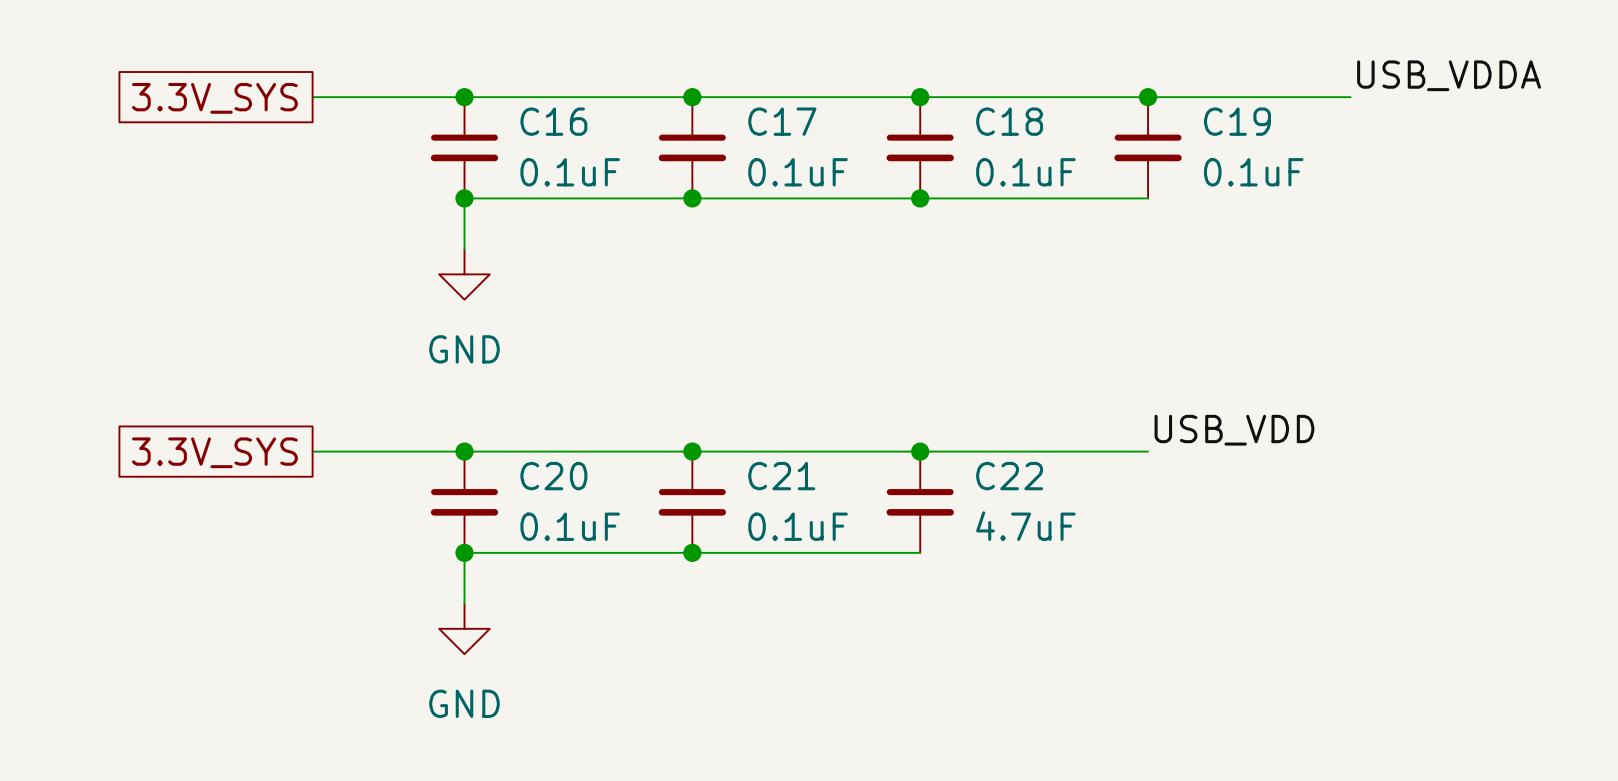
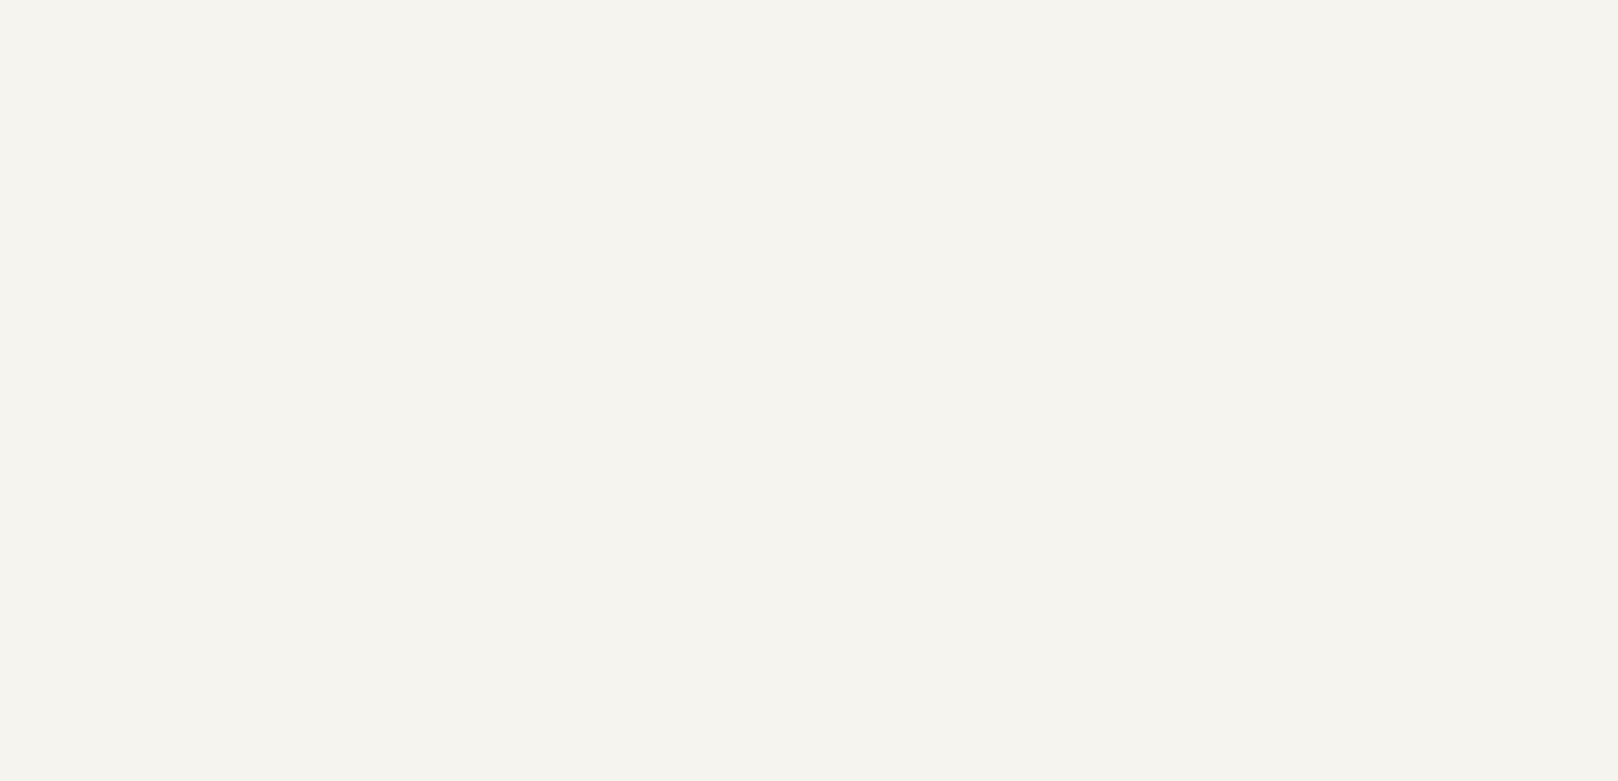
label: USB_VDDA (1449, 75) -> none
wire: (312, 97) (1350, 97) -> none
junction: (464, 97) -> none
junction: (692, 97) -> none
junction: (920, 97) -> none
junction: (1148, 97) -> none
global label: 3.3V_SYS (214, 98) -> none
C16: 0.1uF (464, 147) -> none
C17: 0.1uF (692, 147) -> none
C18: 0.1uF (920, 147) -> none
C19: 0.1uF (1148, 147) -> none
junction: (464, 198) -> none
junction: (692, 198) -> none
junction: (920, 198) -> none
wire: (1148, 198) (464, 198) (464, 249) -> none
power symbol: GND (464, 274) -> none
label: USB_VDD (1234, 430) -> none
wire: (312, 451) (1148, 451) -> none
junction: (464, 451) -> none
junction: (692, 451) -> none
junction: (920, 451) -> none
global label: 3.3V_SYS (214, 452) -> none
C20: 0.1uF (464, 502) -> none
C21: 0.1uF (692, 502) -> none
C22: 4.7uF (920, 502) -> none
junction: (464, 552) -> none
junction: (692, 552) -> none
wire: (920, 552) (464, 552) (464, 603) -> none
power symbol: GND (464, 628) -> none

